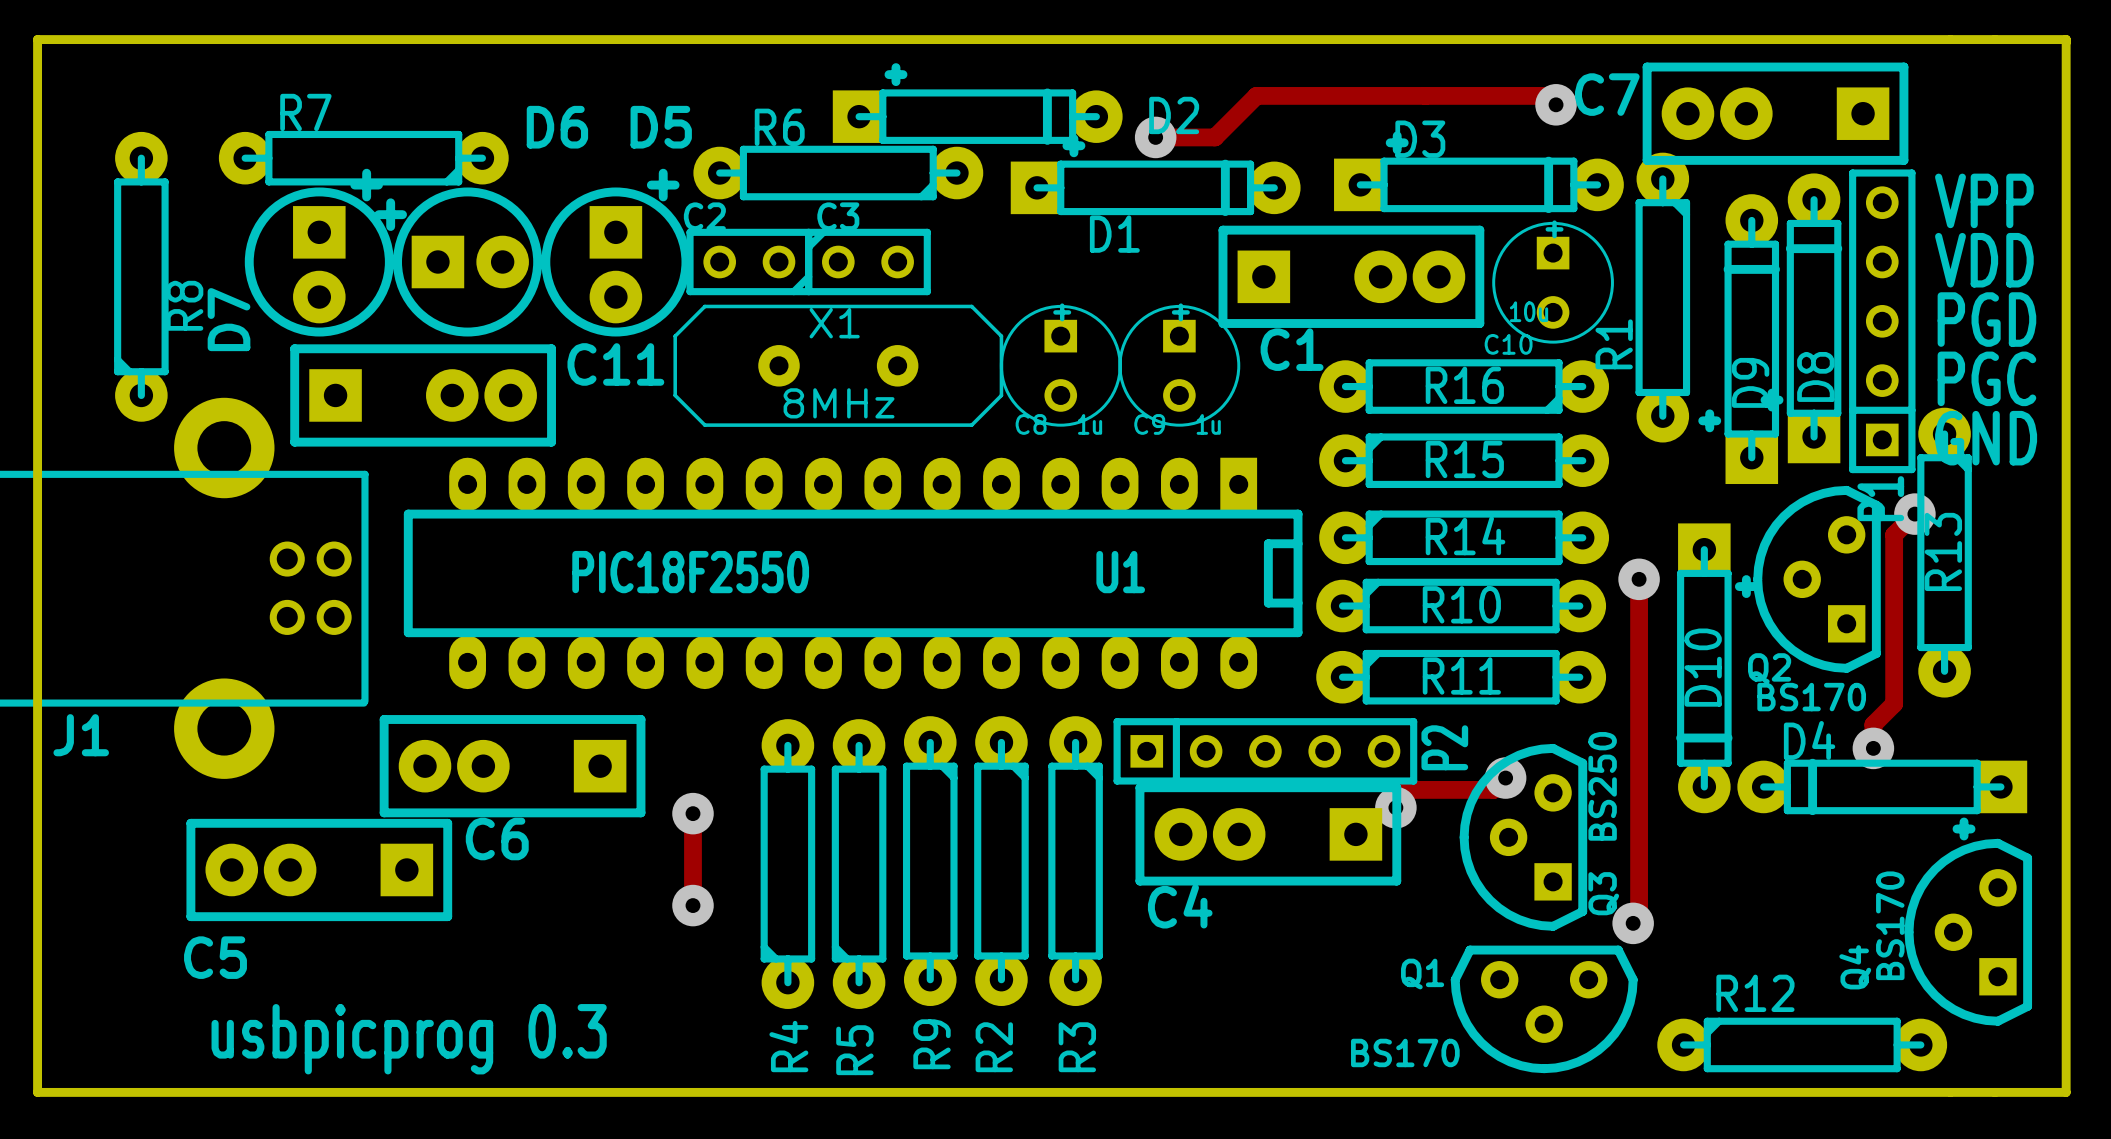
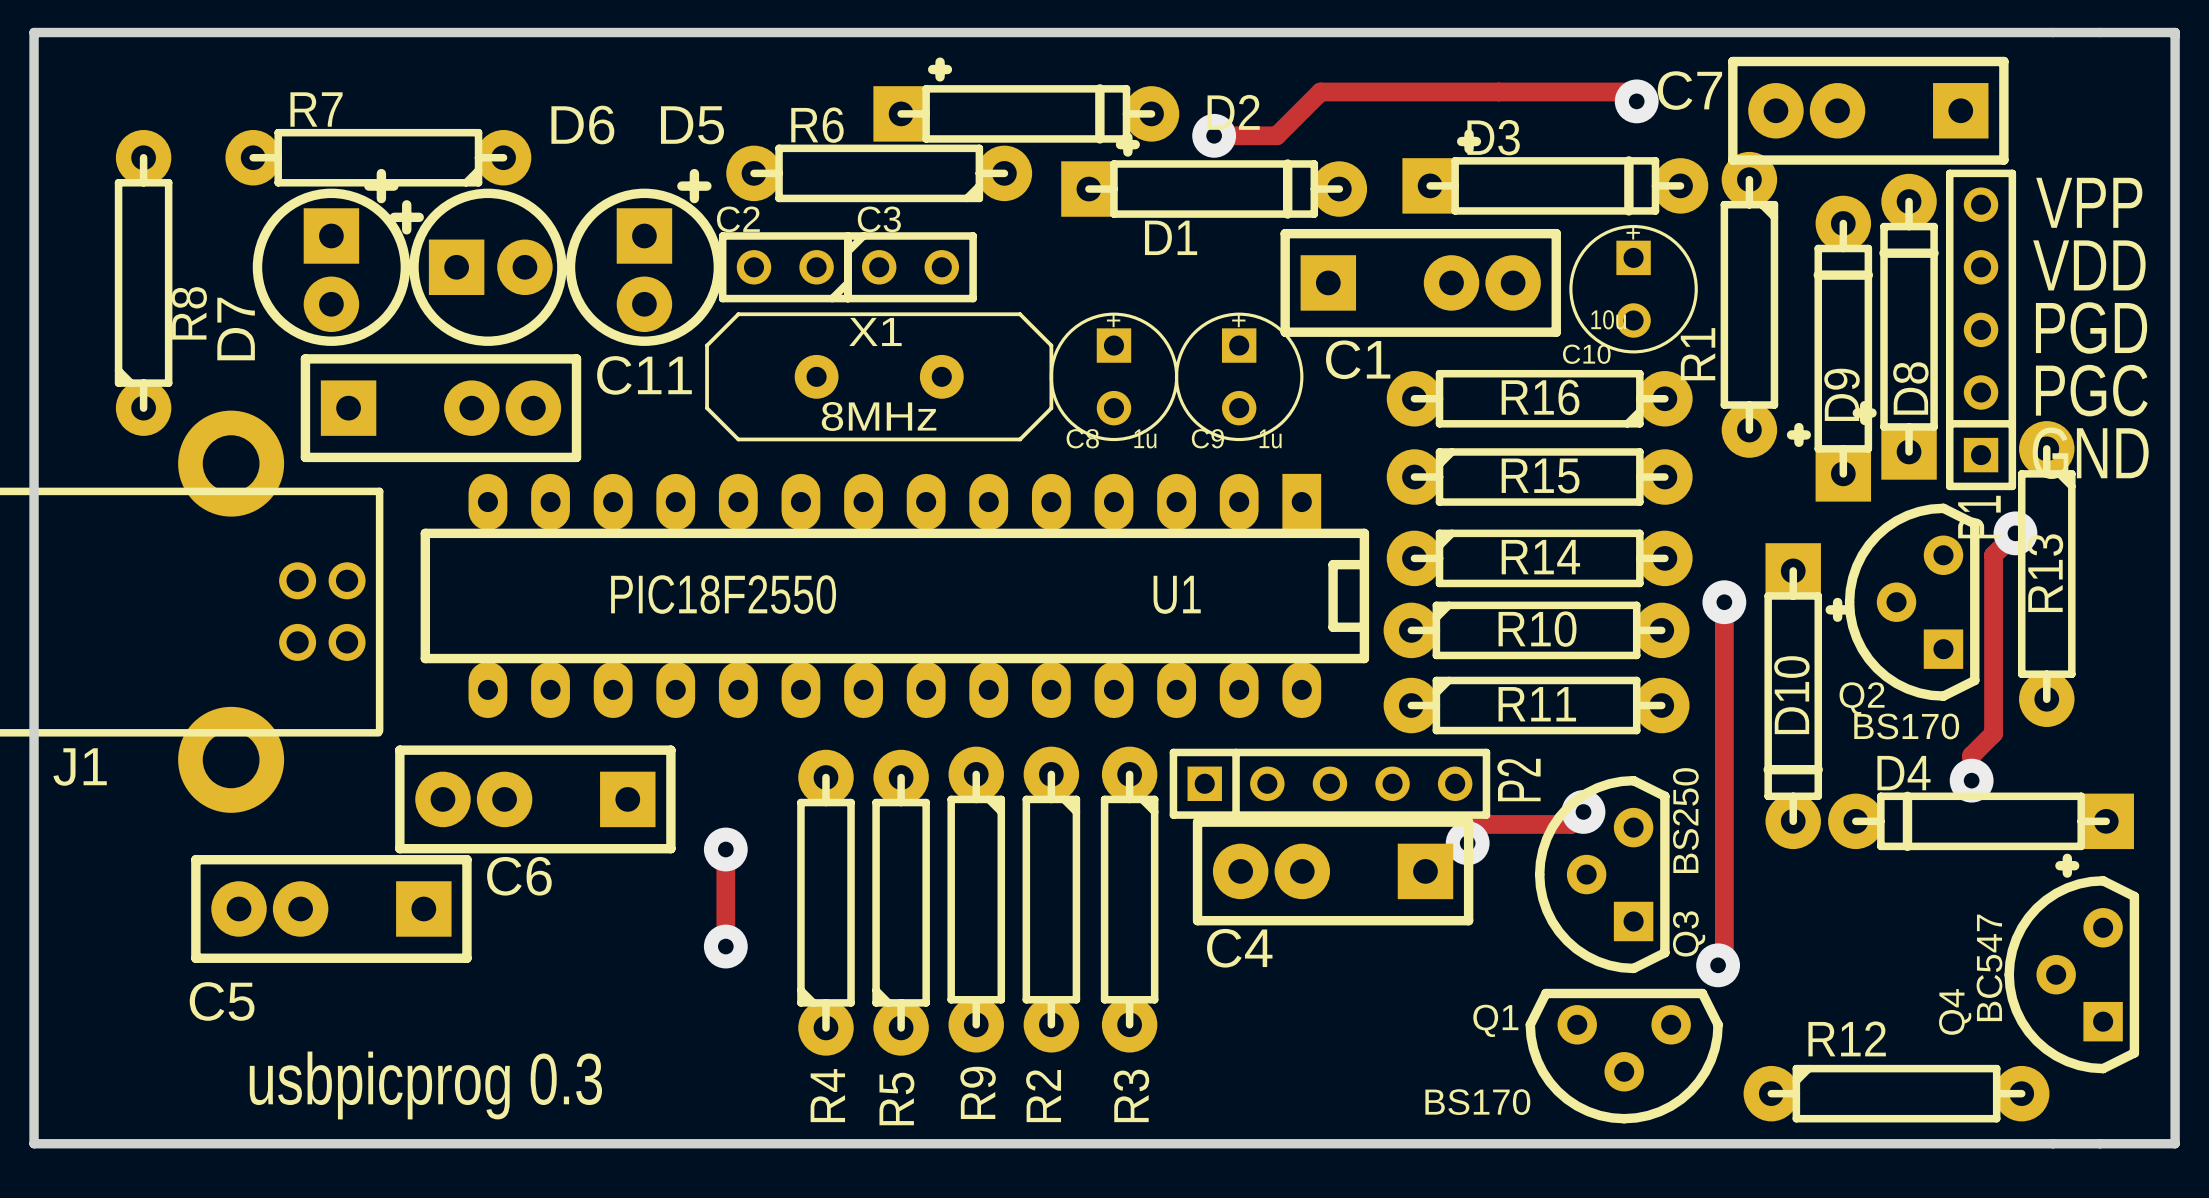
Q4 value: BS170 (1890, 925) -> BC547 (1989, 967)

